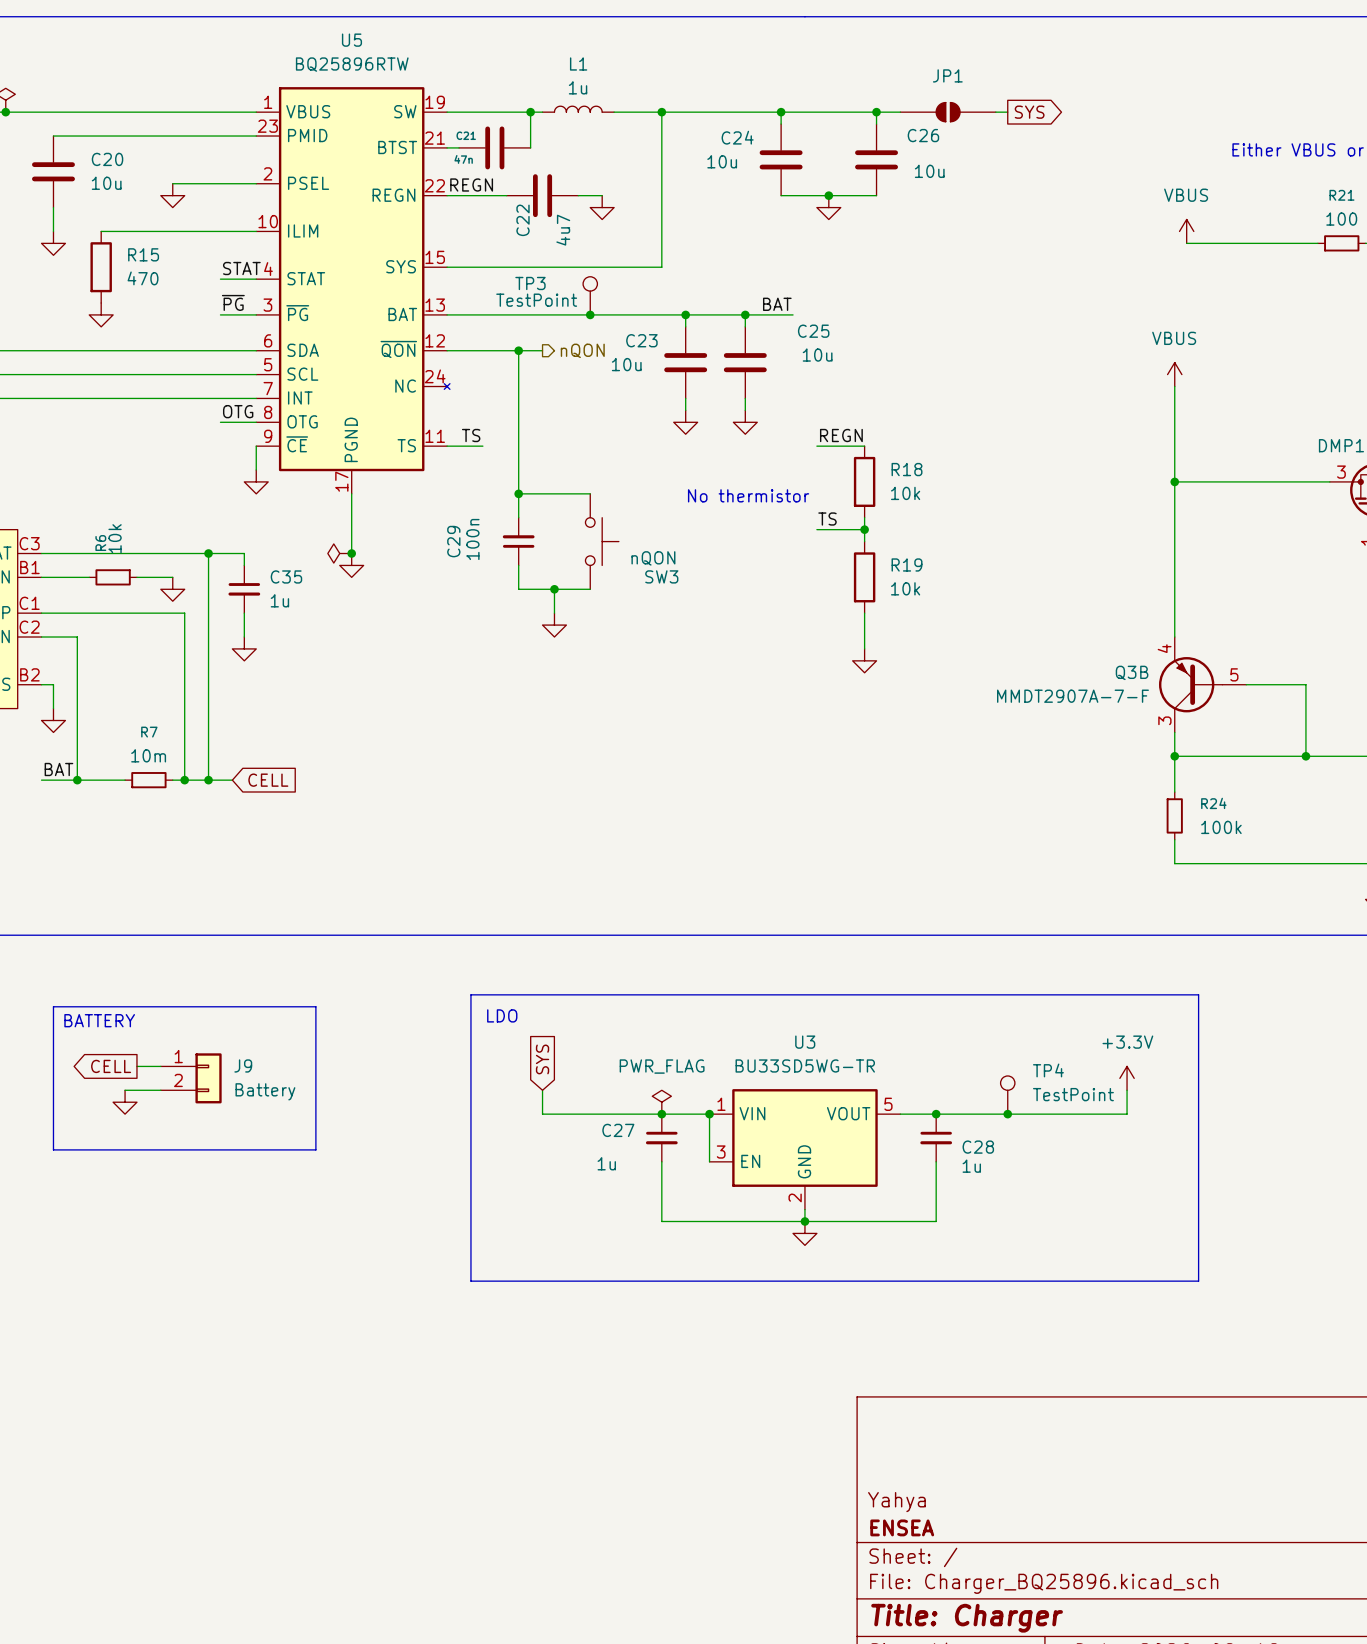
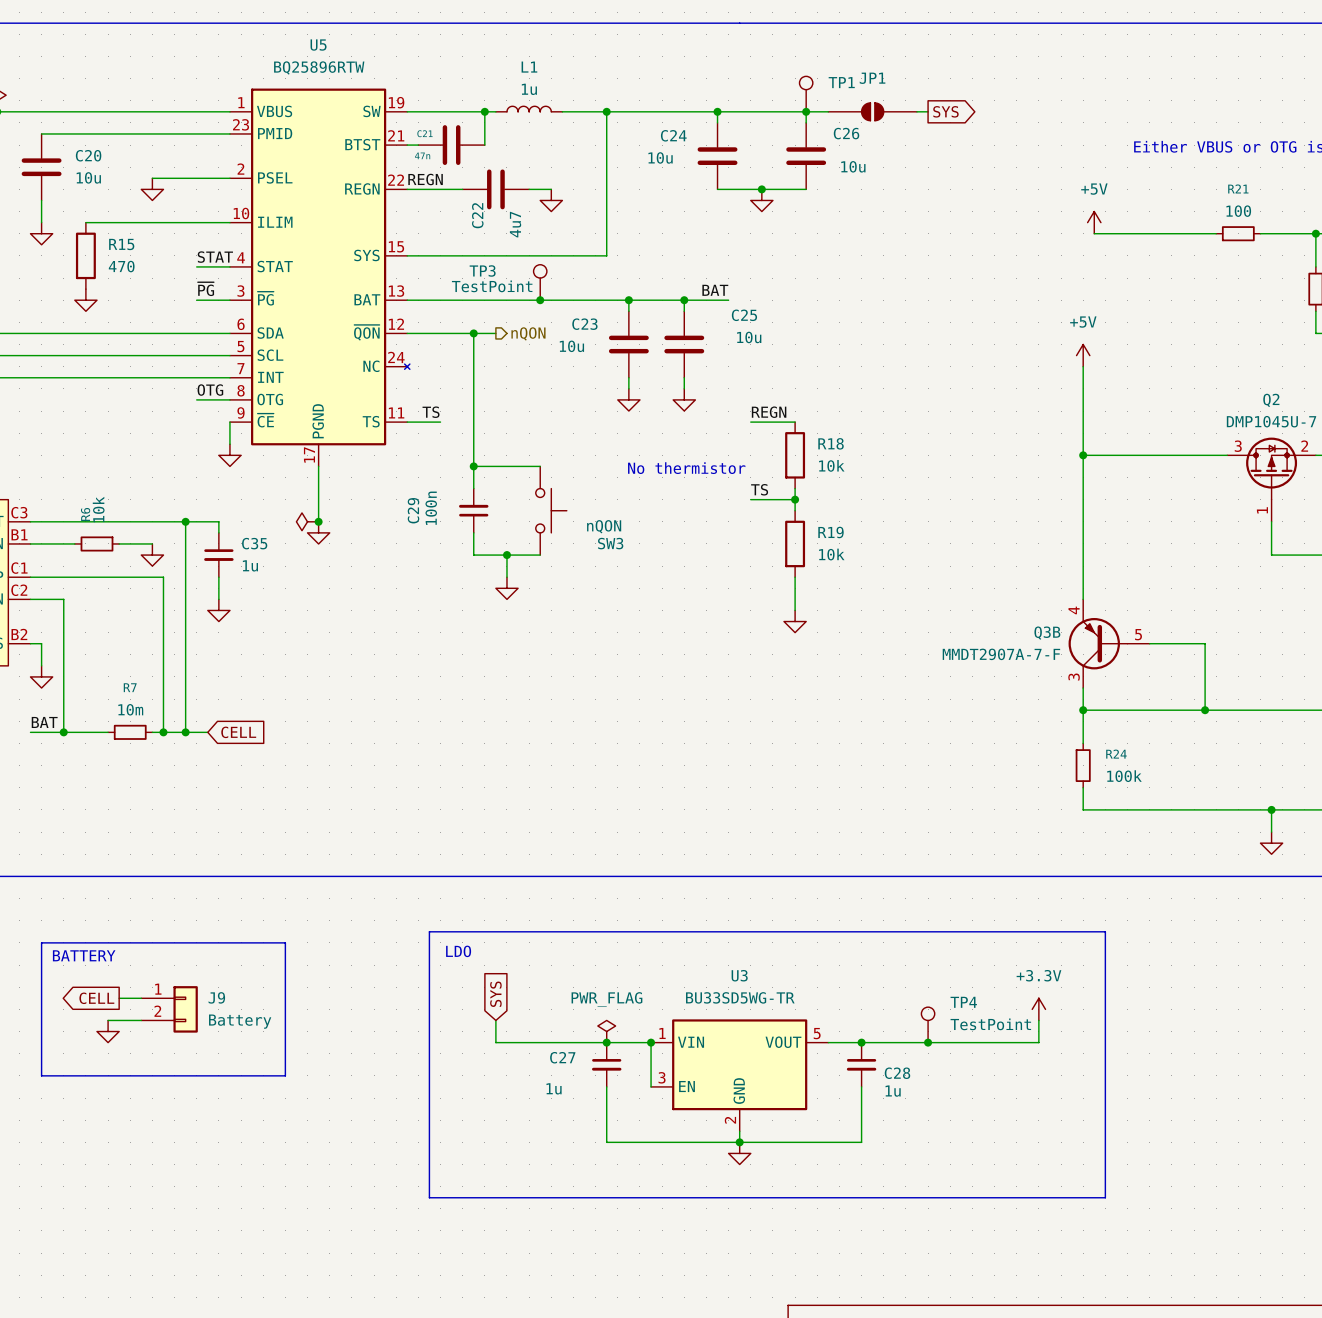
TP1: none -> (806, 94)
power symbol: VBUS (1186, 231) -> +5V (1094, 222)
power symbol: VBUS (1174, 374) -> +5V (1083, 355)

